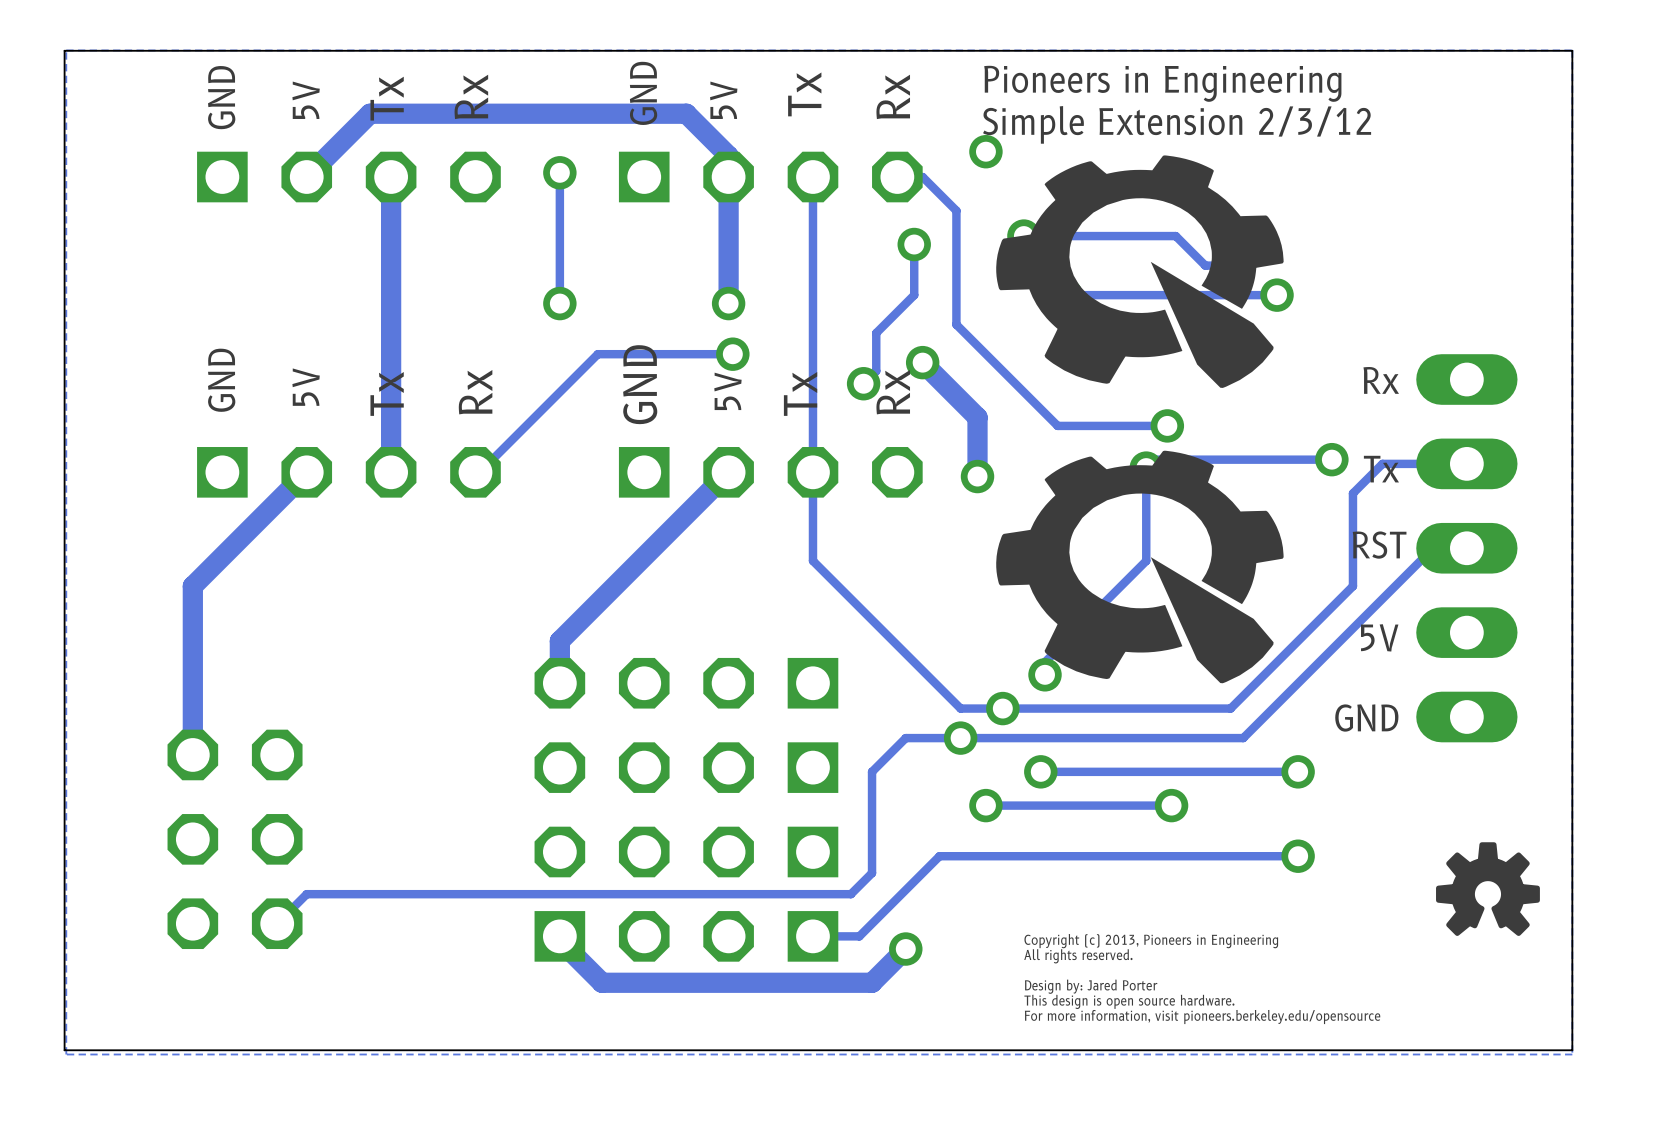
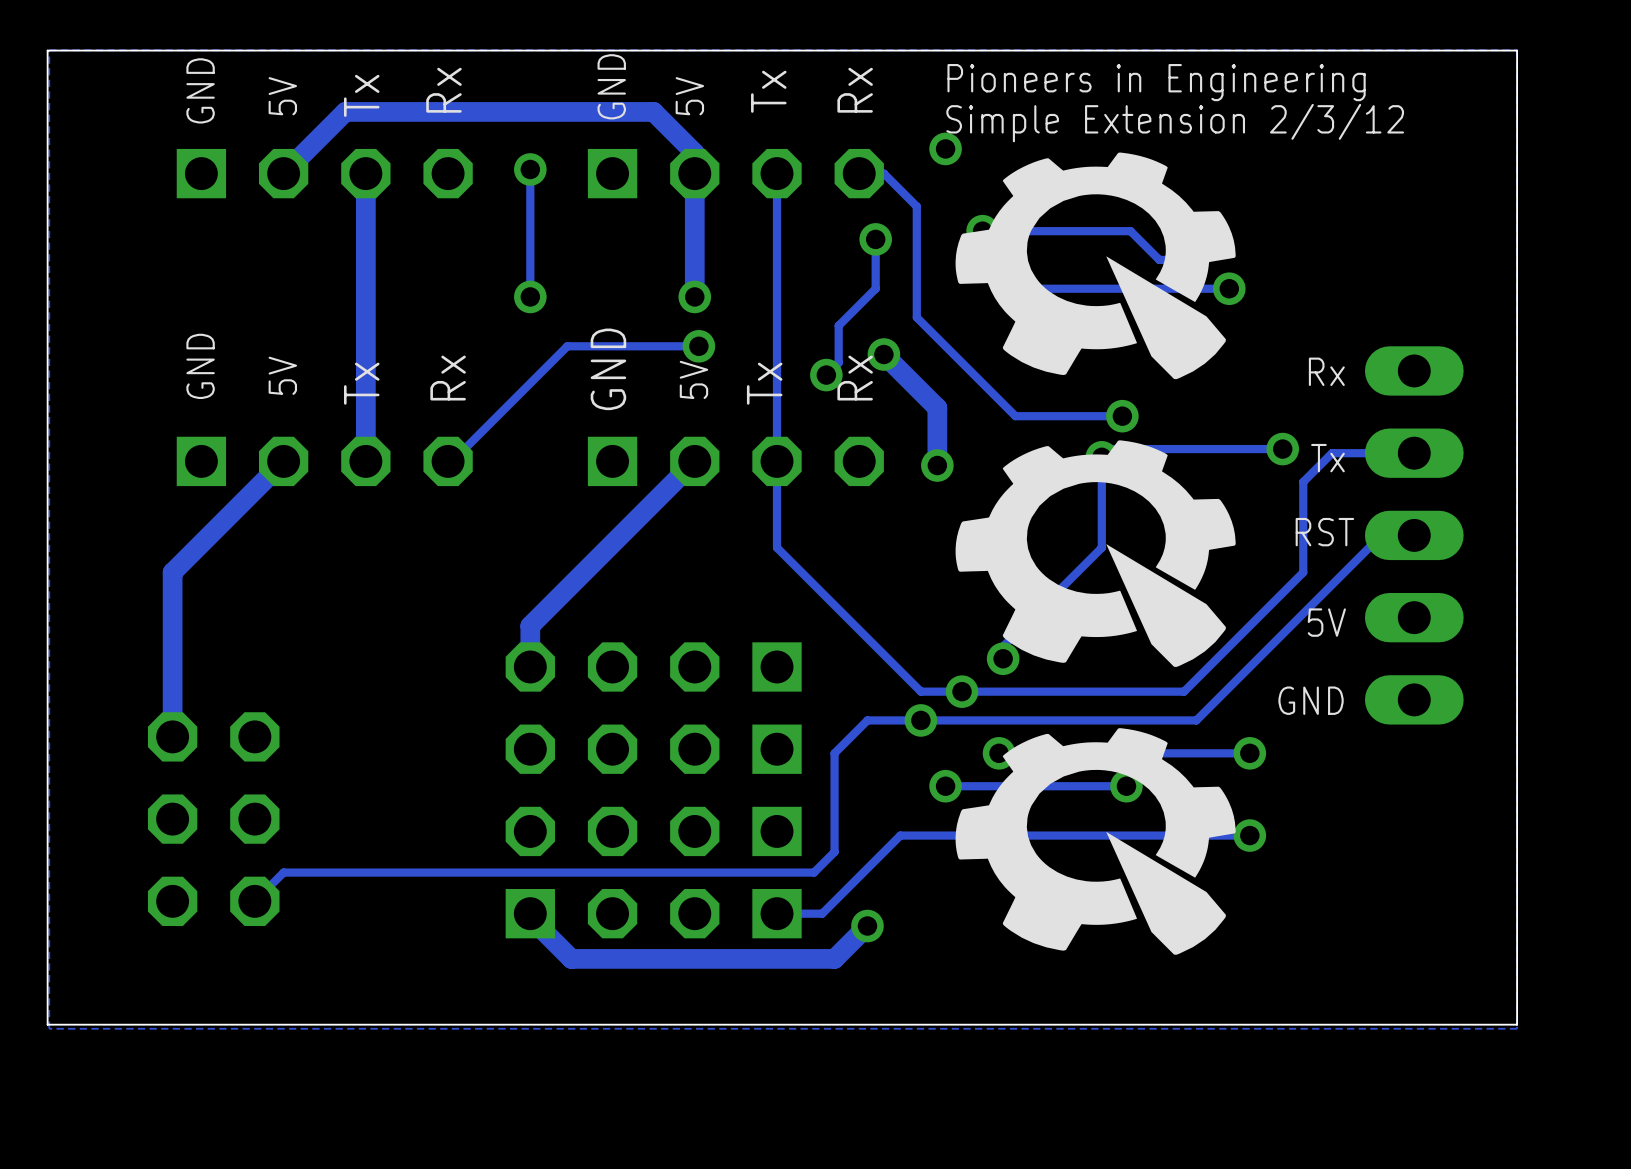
drawing: none -> [955, 728, 1236, 955]
drawing: [1436, 842, 1540, 936] -> none
text: Copyright (c) 2013, Pioneers in Engineering (1151, 941) -> none
text: All rights reserved. (1078, 956) -> none
text: Design by: Jared Porter (1091, 986) -> none
text: This design is open source hardware. (1129, 1001) -> none
text: For more information, visit pioneers.berkeley.edu/opensource (1202, 1017) -> none

